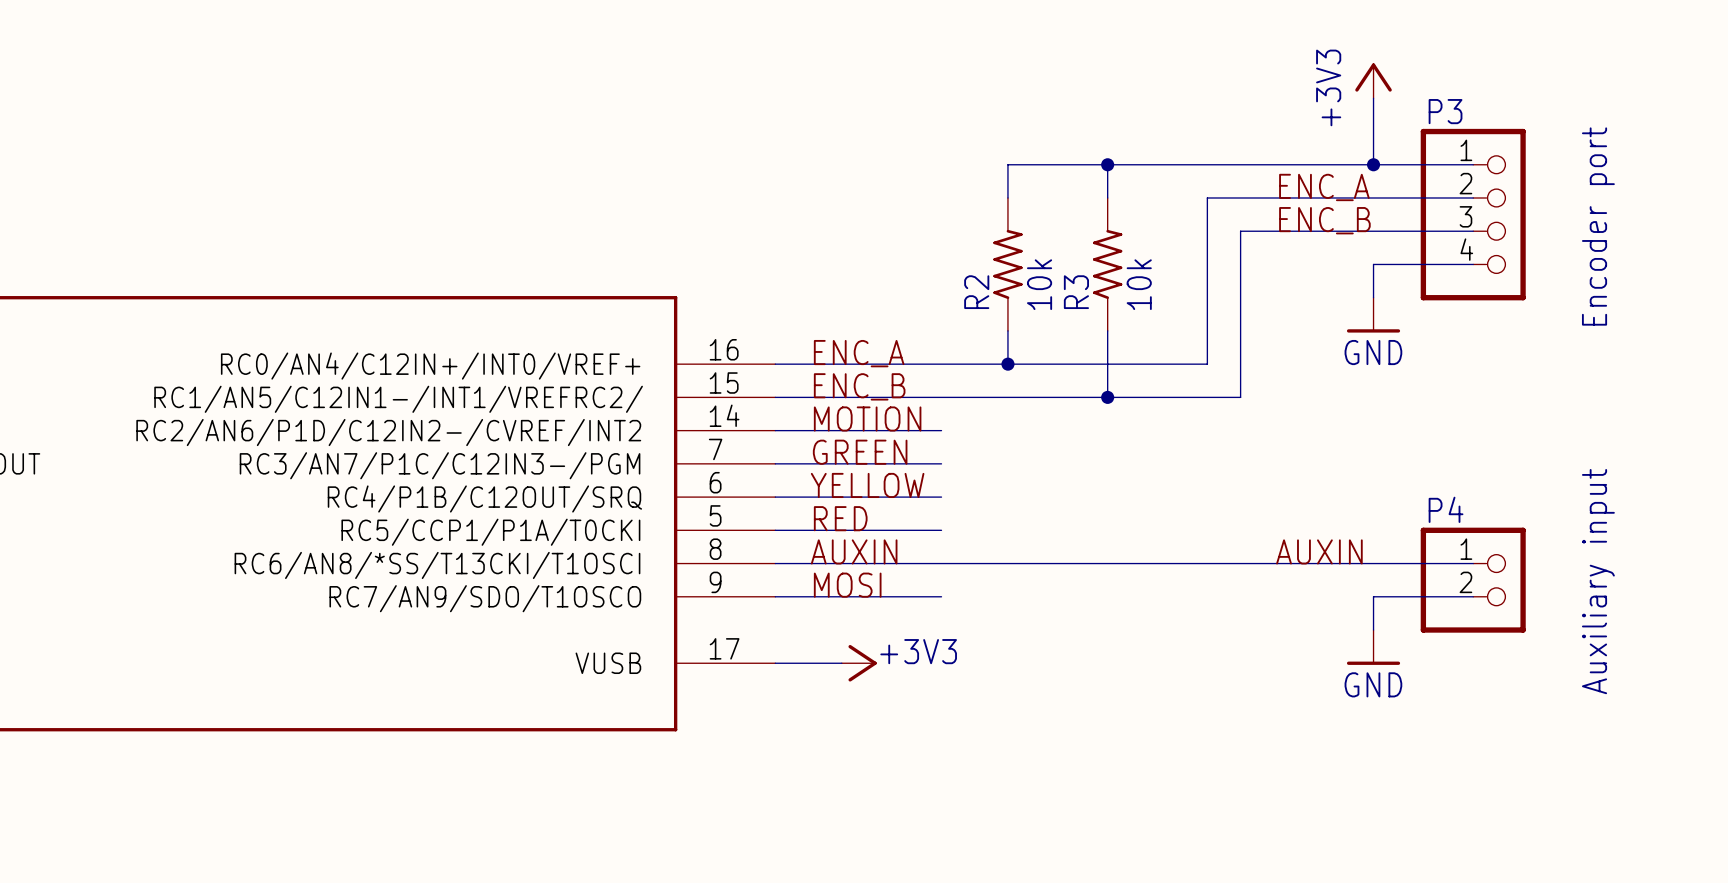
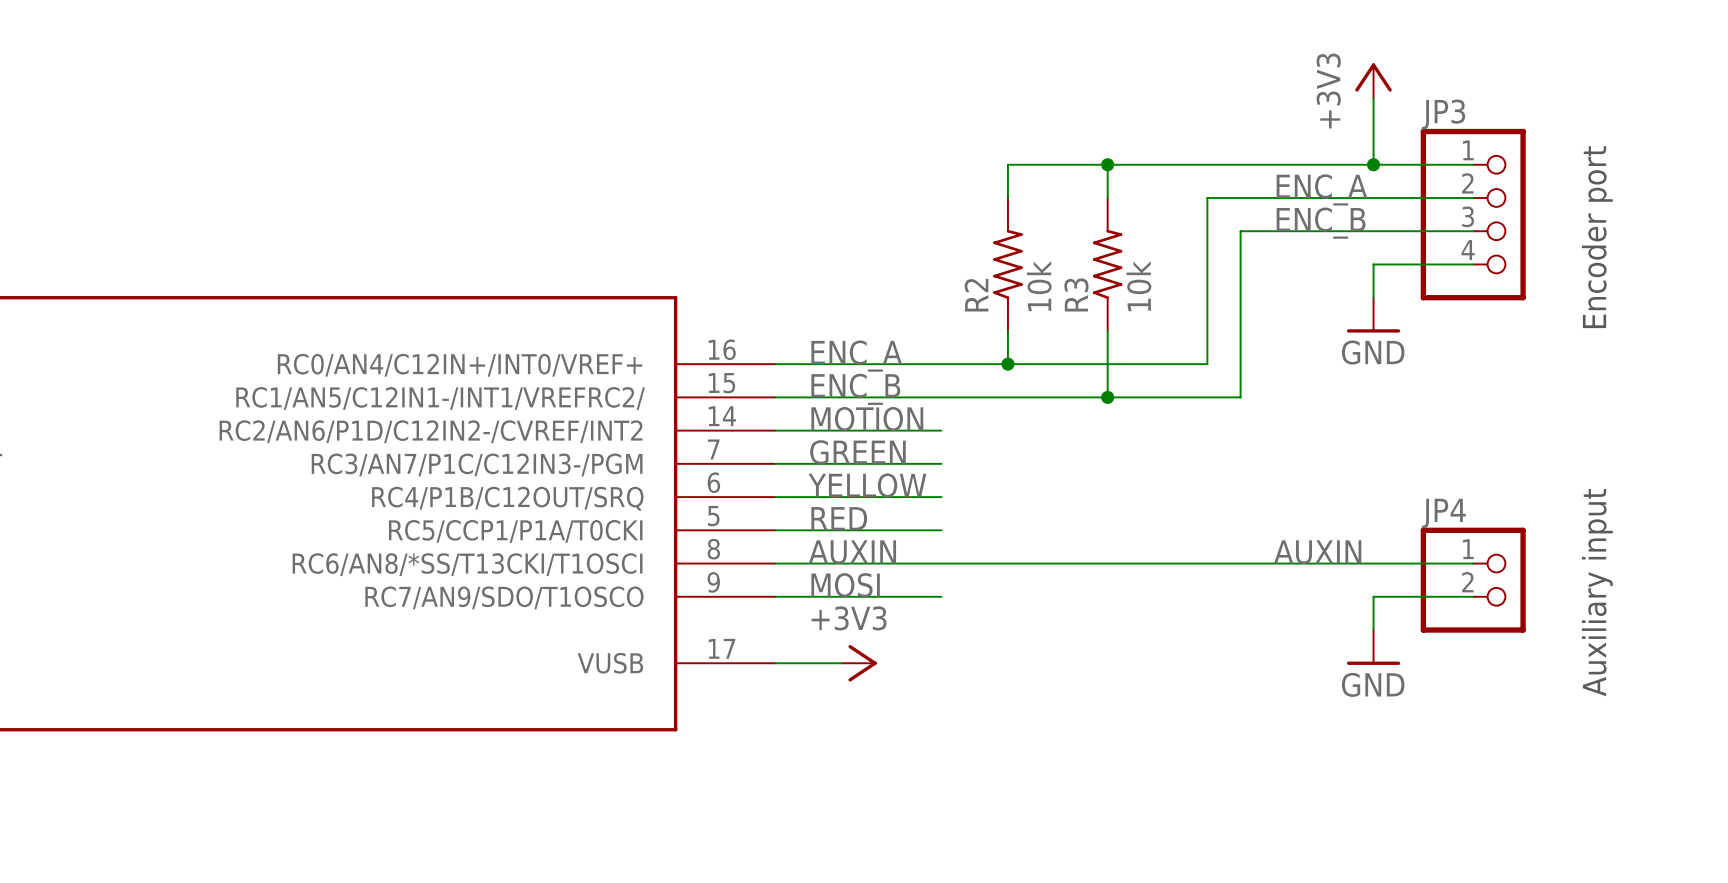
P3 name: P3 (1445, 111) -> JP3 (1443, 114)
P4 name: P4 (1446, 509) -> JP4 (1443, 513)
power symbol text position: +3V3 (918, 651) -> +3V3 (849, 618)

